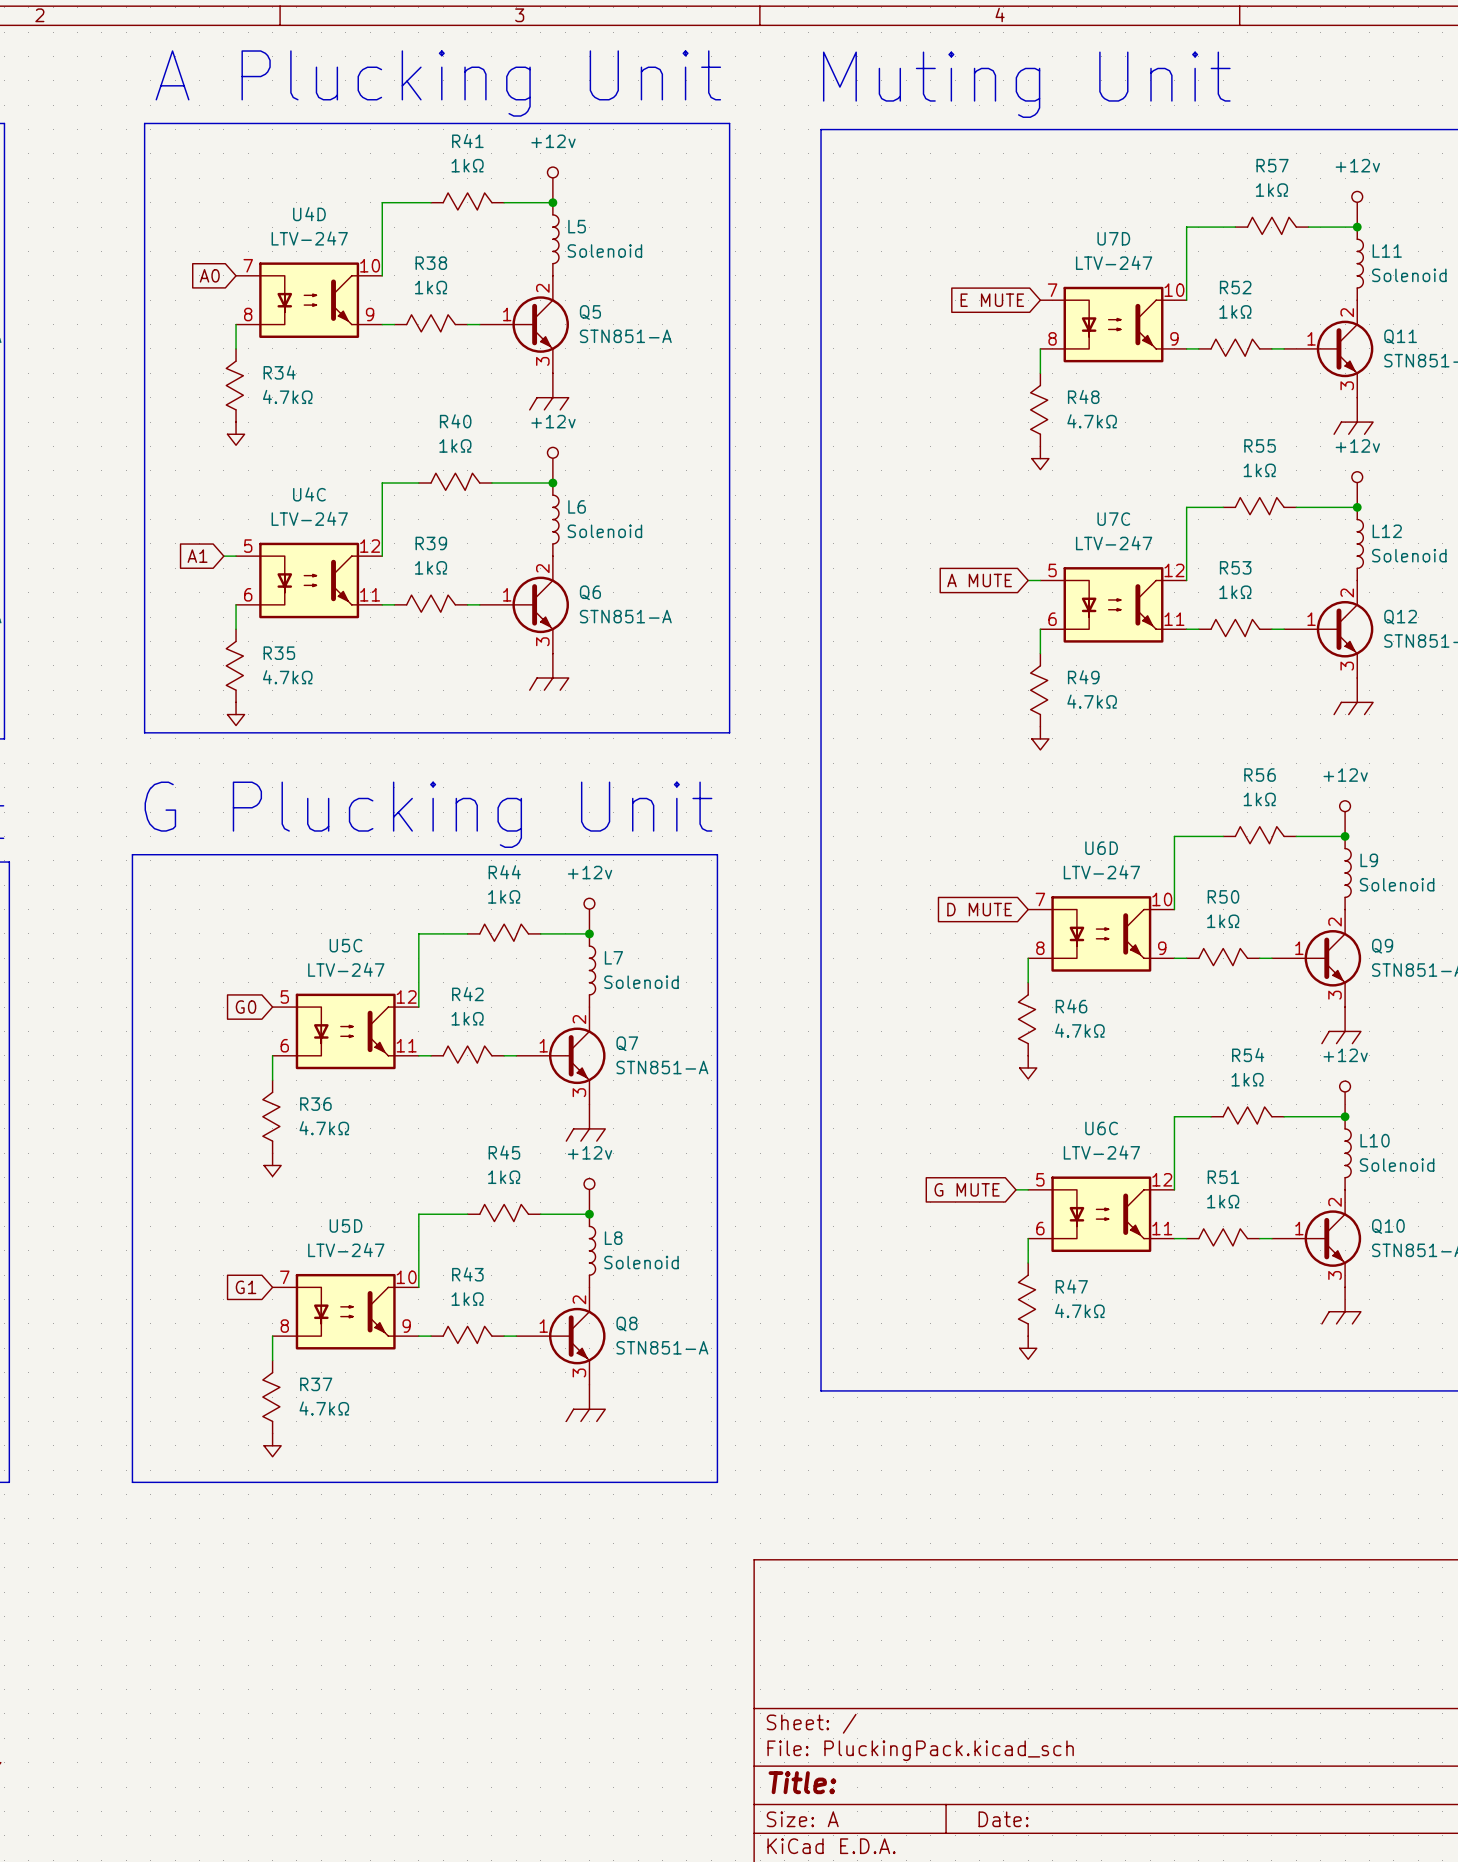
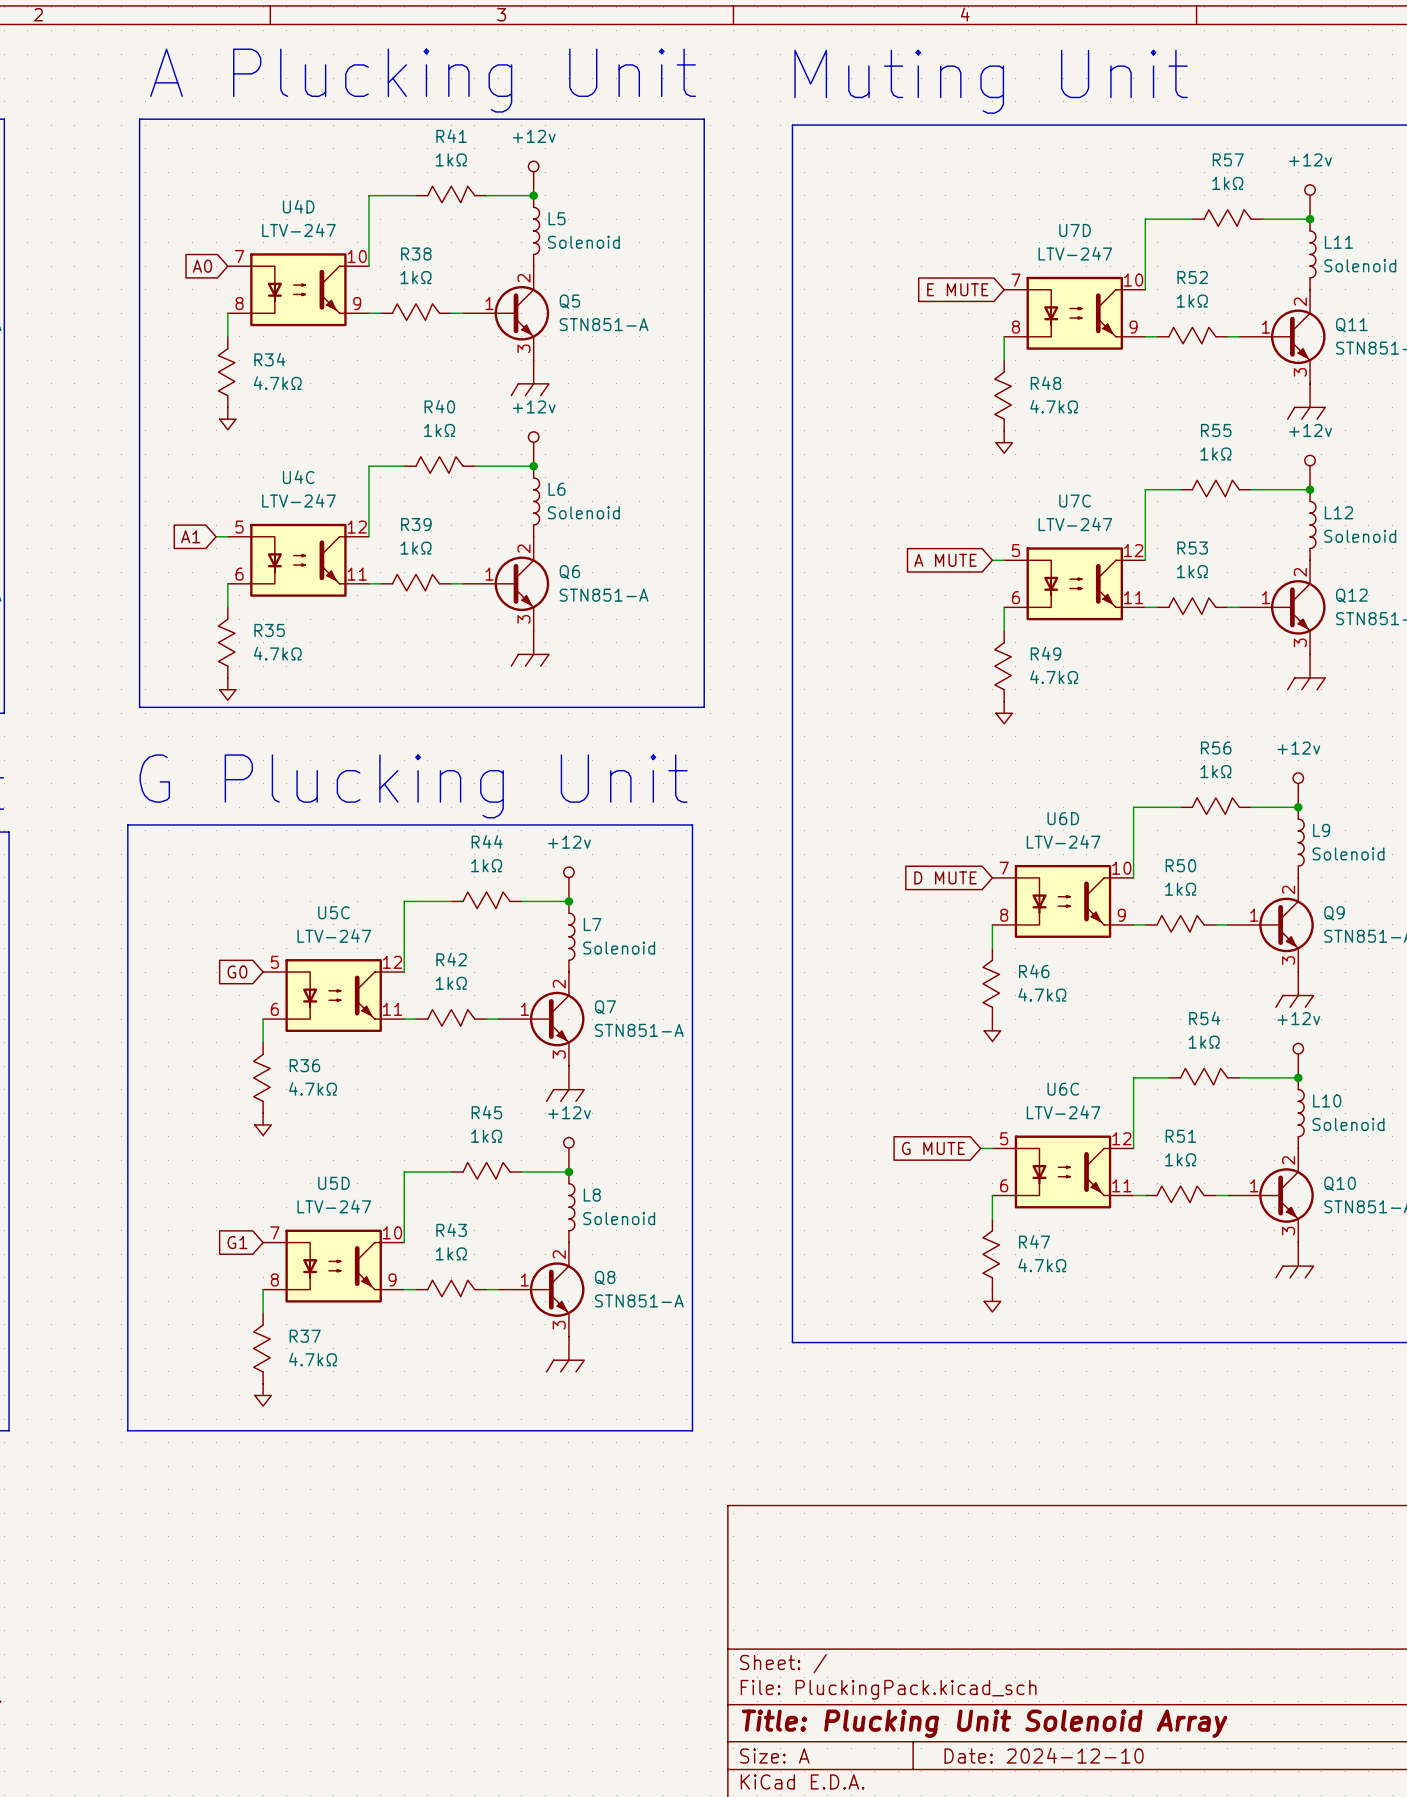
title block: Title: (802, 1782) -> Title: Plucking Unit Solenoid Array (984, 1723)
title block: Date: (1003, 1819) -> Date: 2024-12-10 (1044, 1755)

